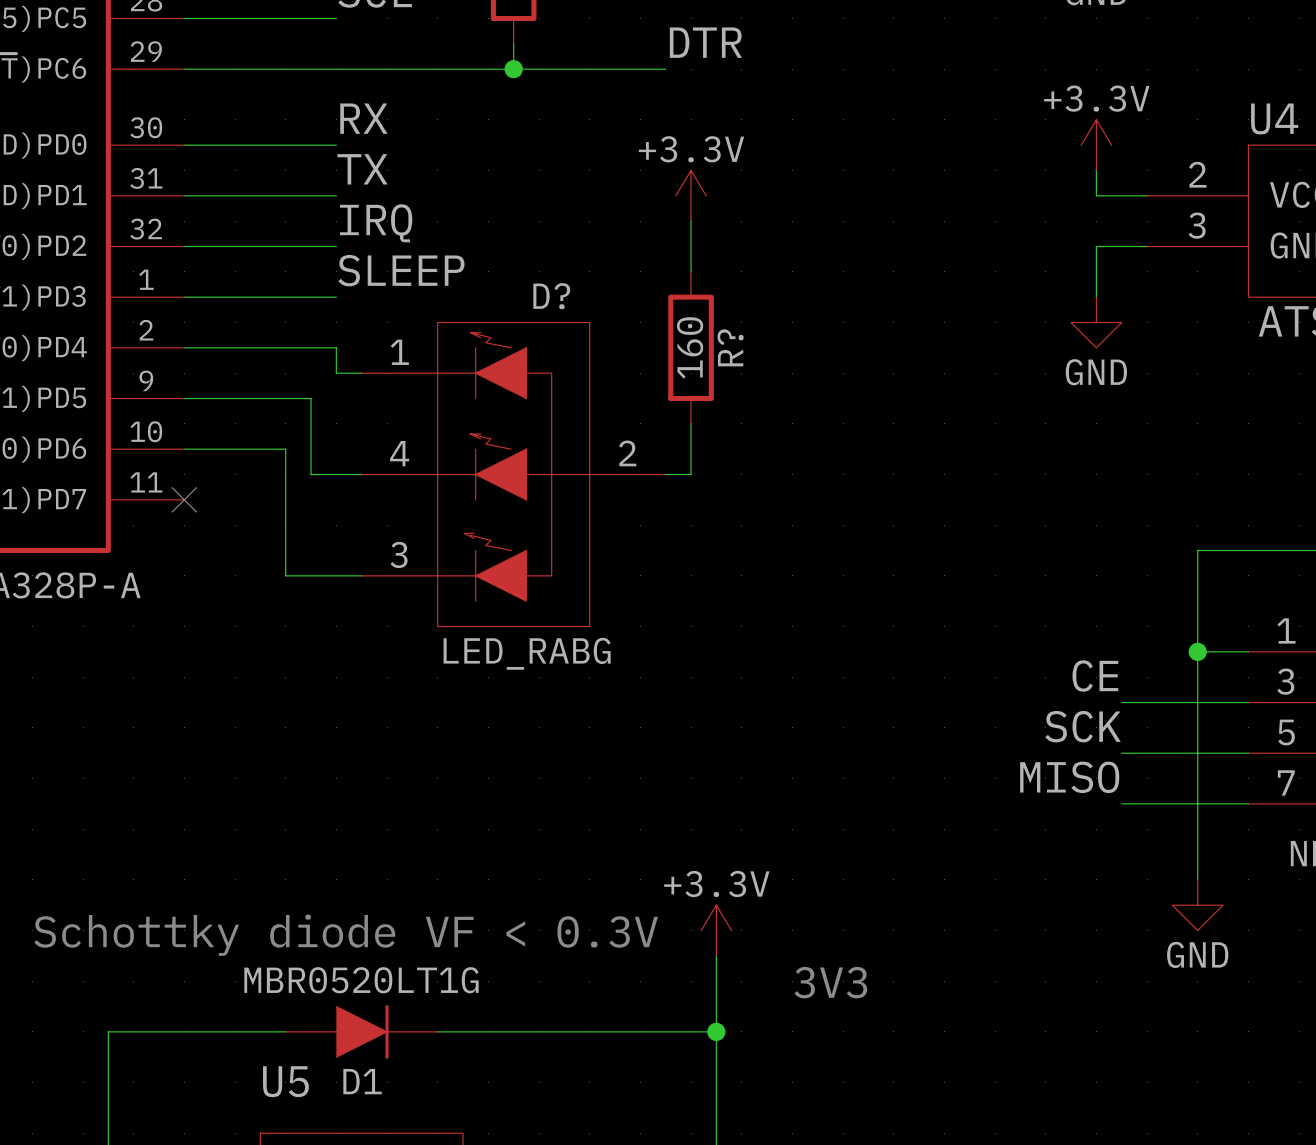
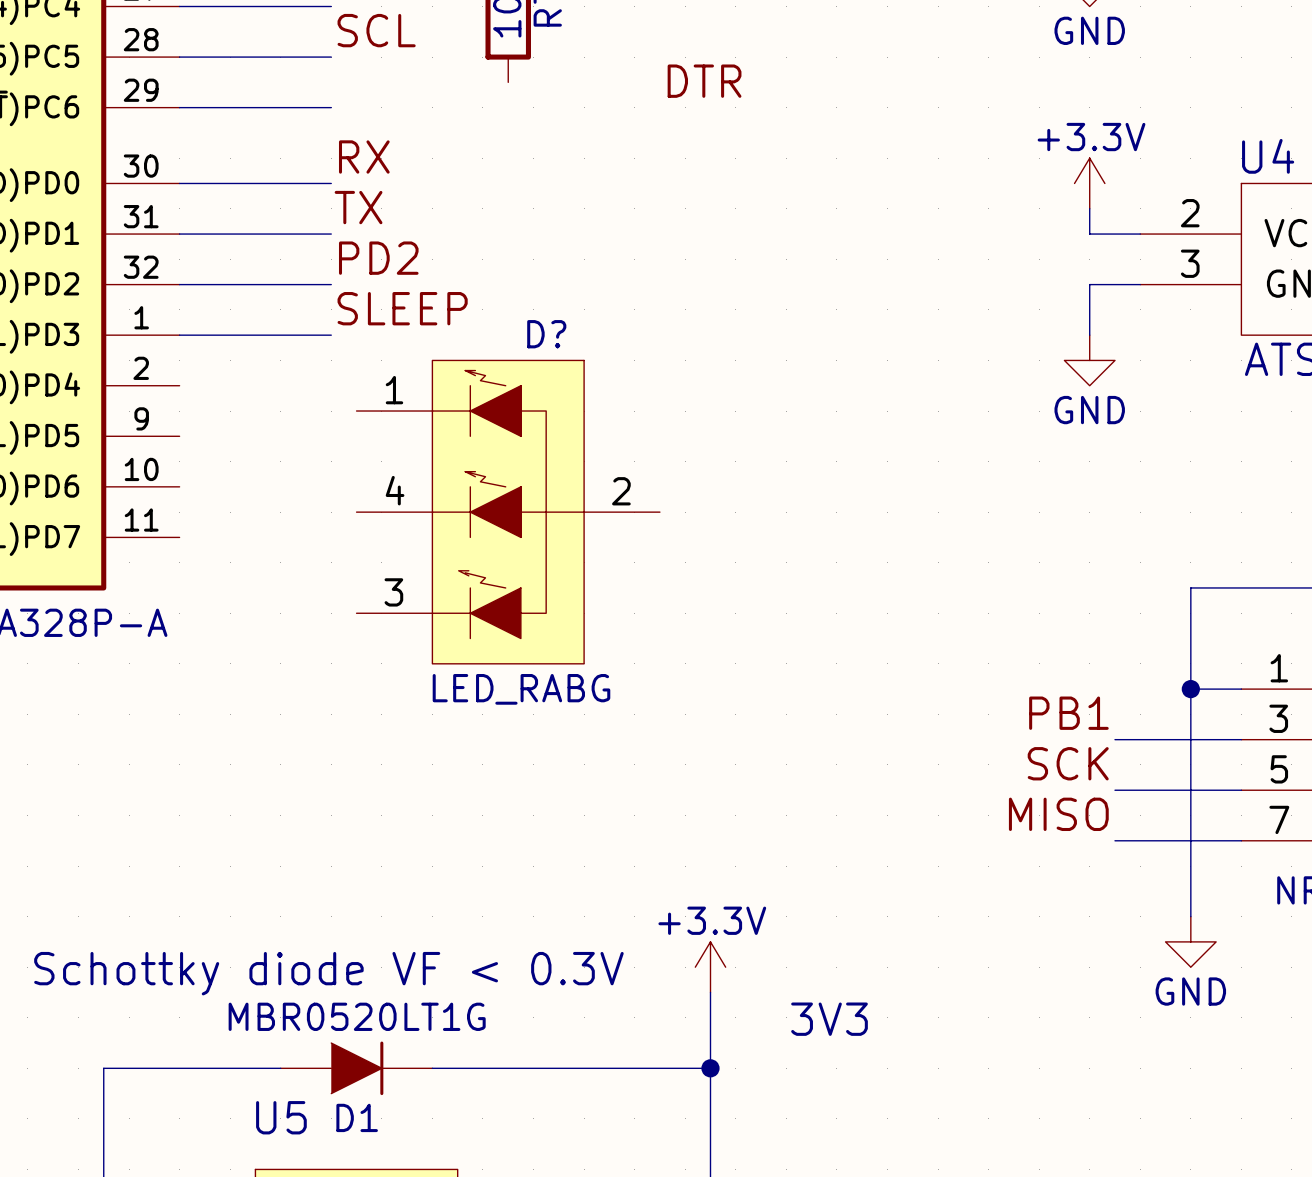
wire: (513, 43) (513, 69) -> none
wire: (336, 69) (665, 69) -> none
junction: (513, 69) -> none
power symbol: +3.3V (691, 195) -> none
wire: (691, 221) (691, 271) -> none
label: IRQ (376, 223) -> PD2 (378, 258)
wire: (184, 347) (336, 347) (336, 373) (361, 373) -> none
R?: 160 (691, 347) -> none
wire: (184, 398) (311, 398) (311, 474) (361, 474) -> none
wire: (691, 423) (691, 474) (665, 474) -> none
wire: (184, 449) (285, 449) (285, 575) (361, 575) -> none
no-connect mark: (184, 499) -> none
label: CE (1095, 676) -> PB1 (1068, 713)

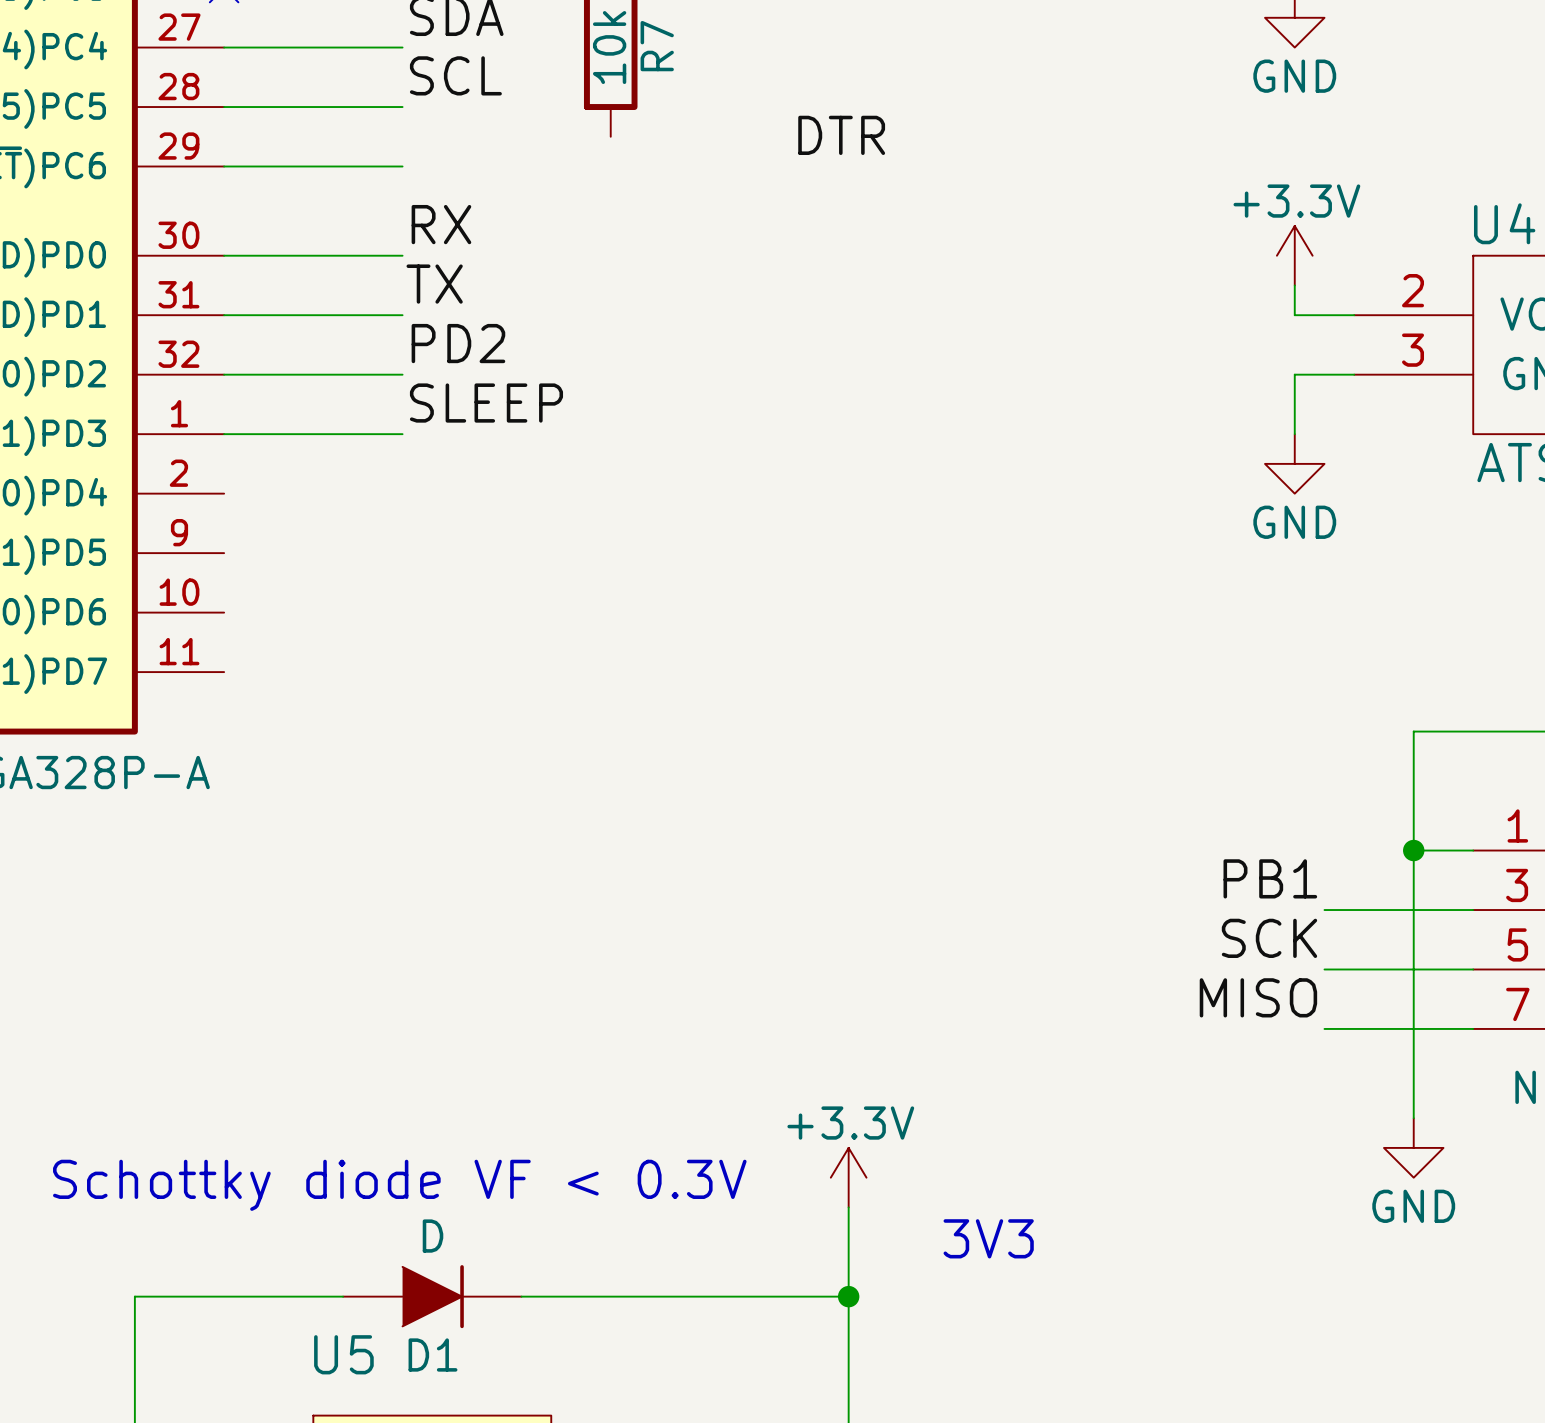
D?: LED_RABG (508, 512) -> none
D1 value: MBR0520LT1G (357, 1016) -> D (433, 1236)

